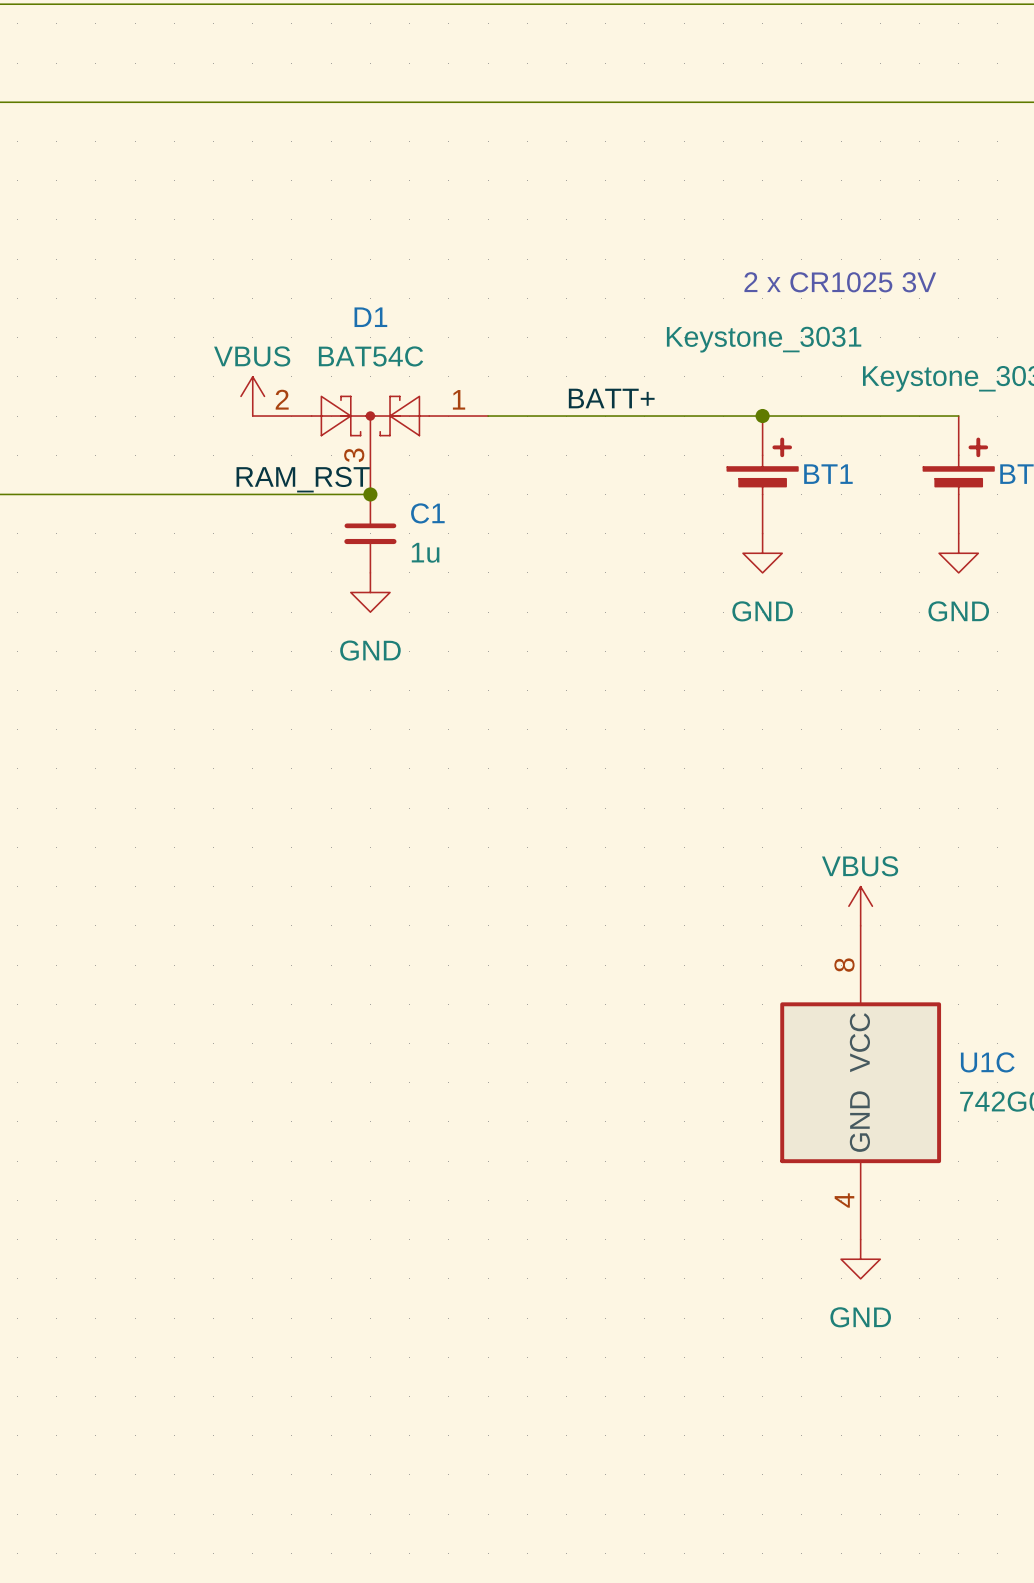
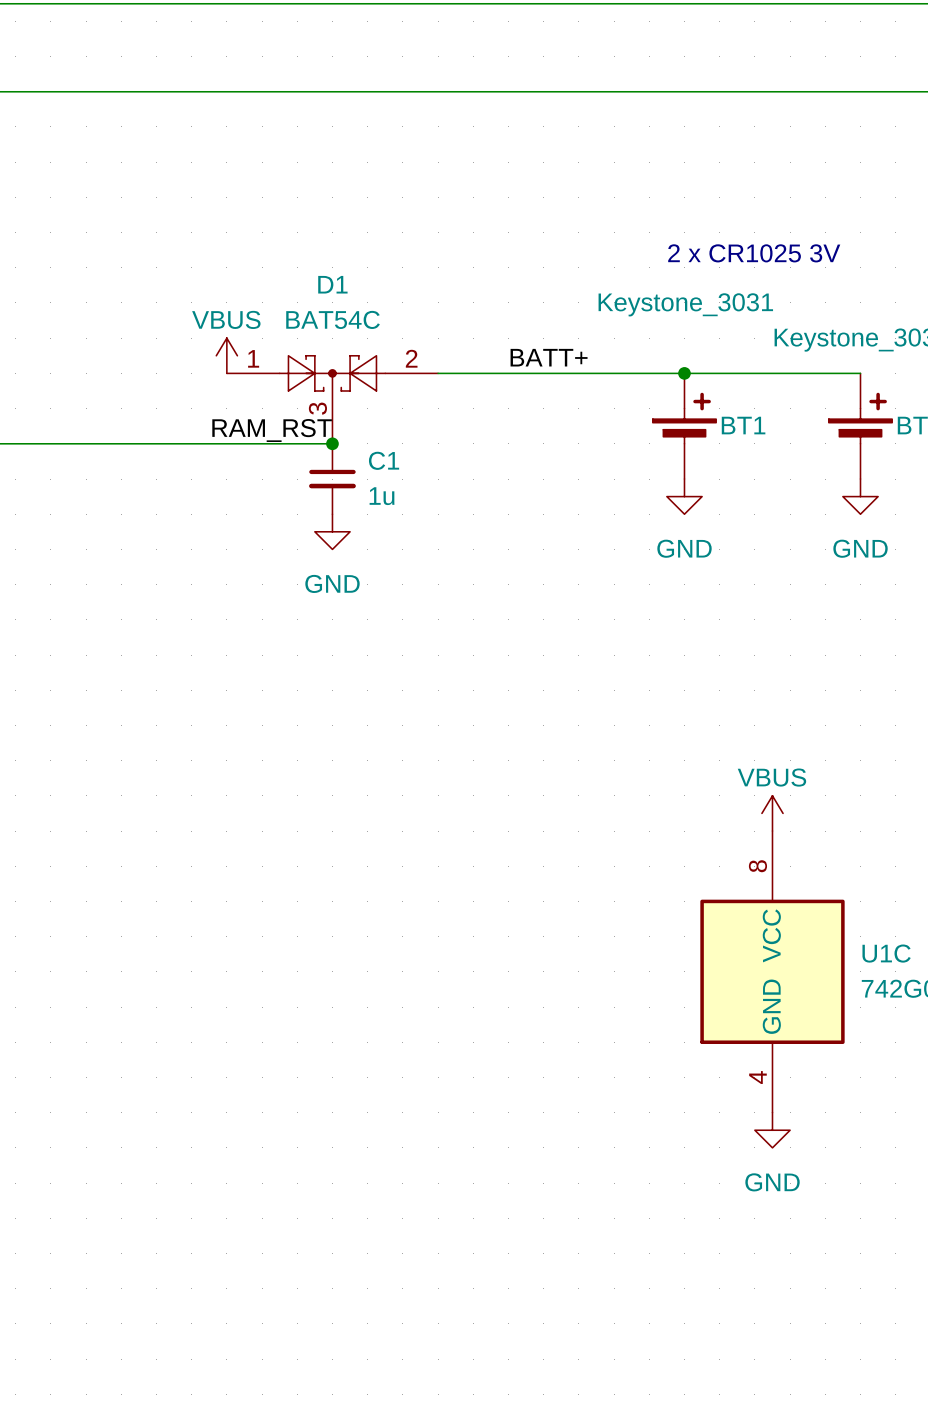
D1 flip: as is (370, 416) -> left-right (332, 373)

